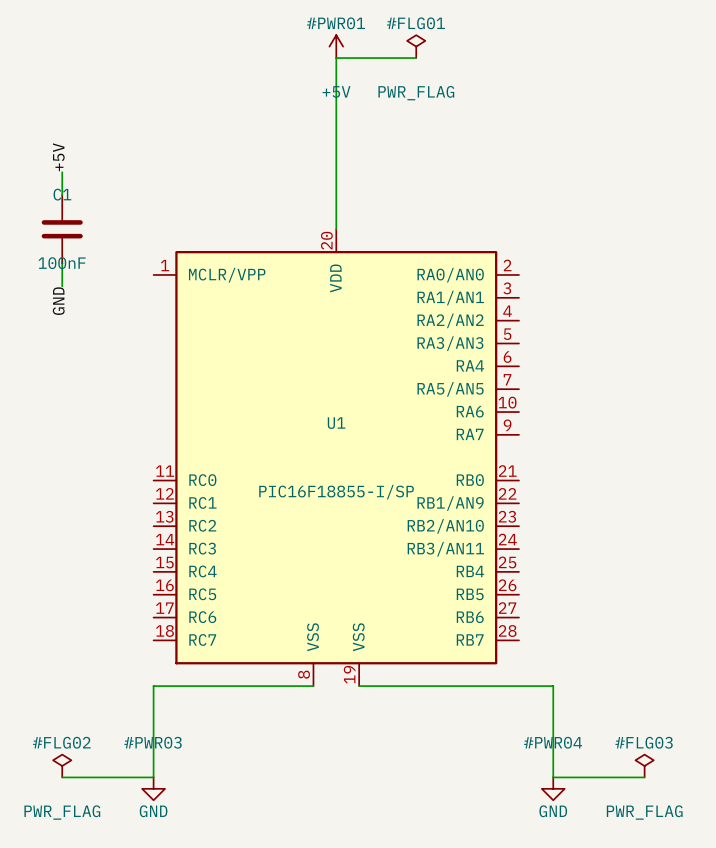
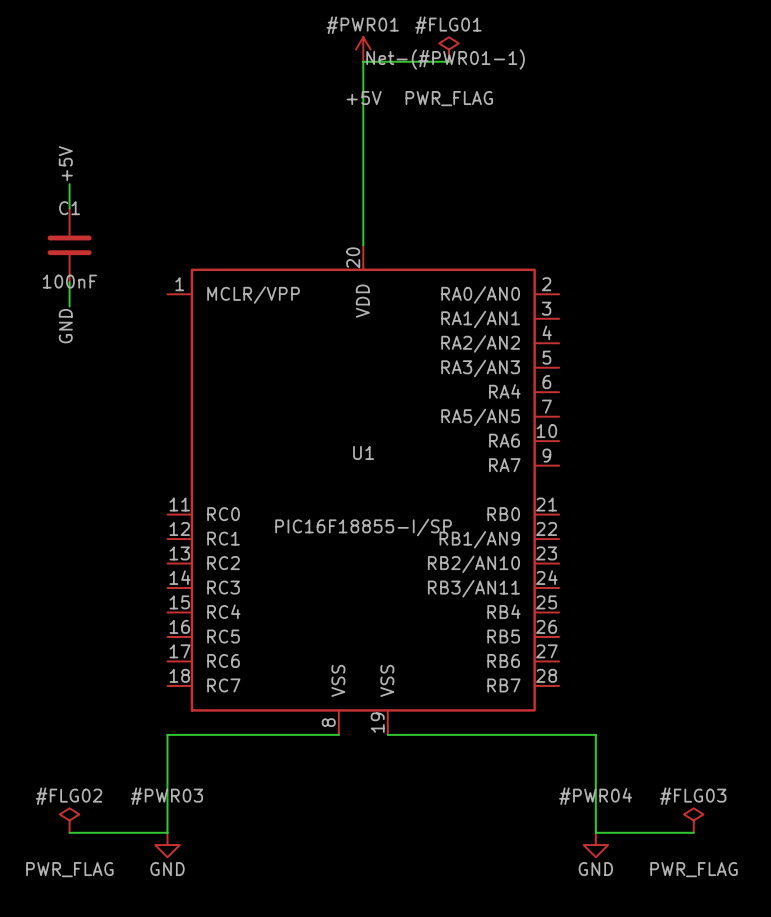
label: none -> Net-(#PWR01-1) (445, 59)

